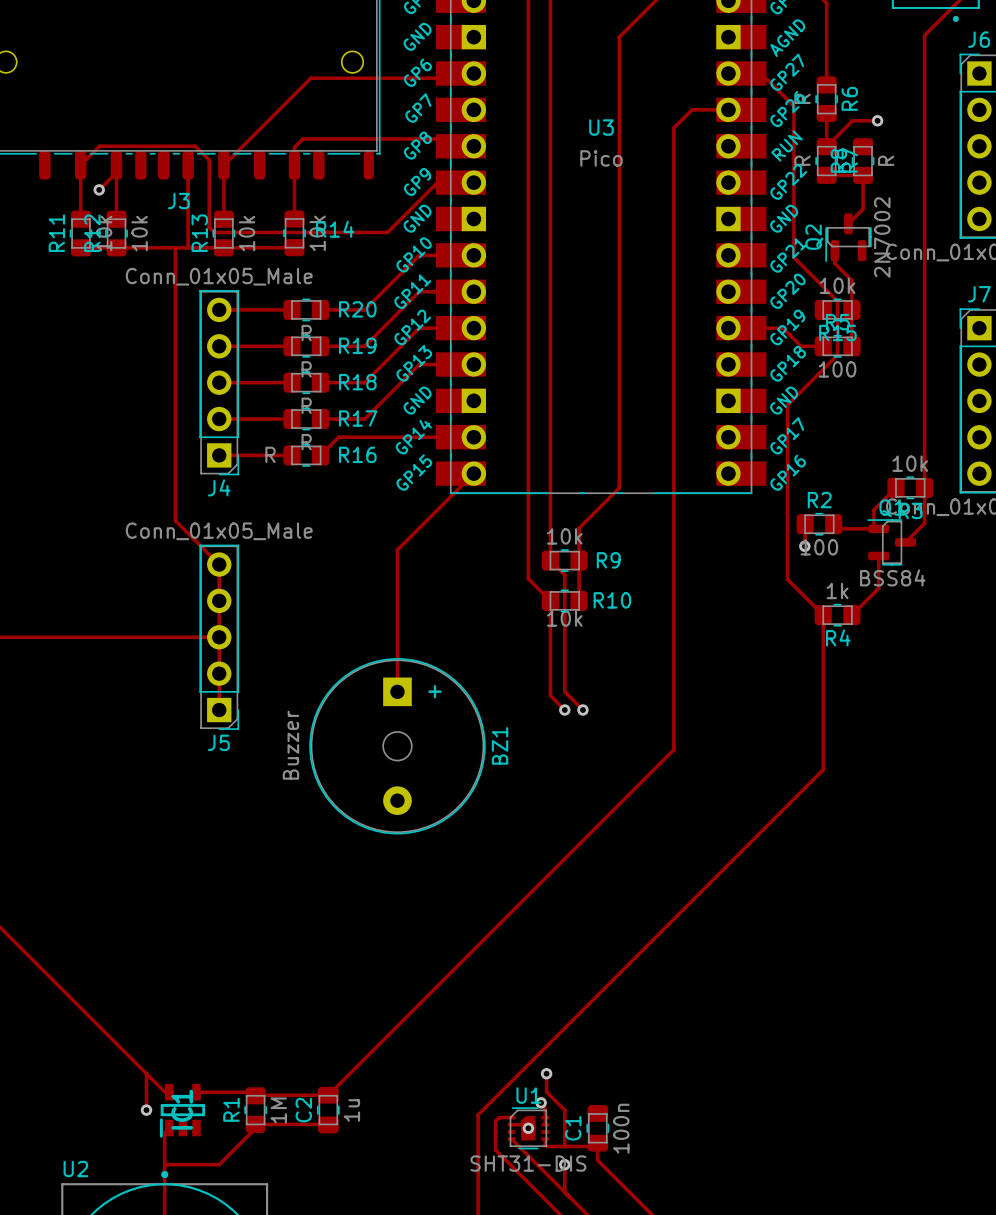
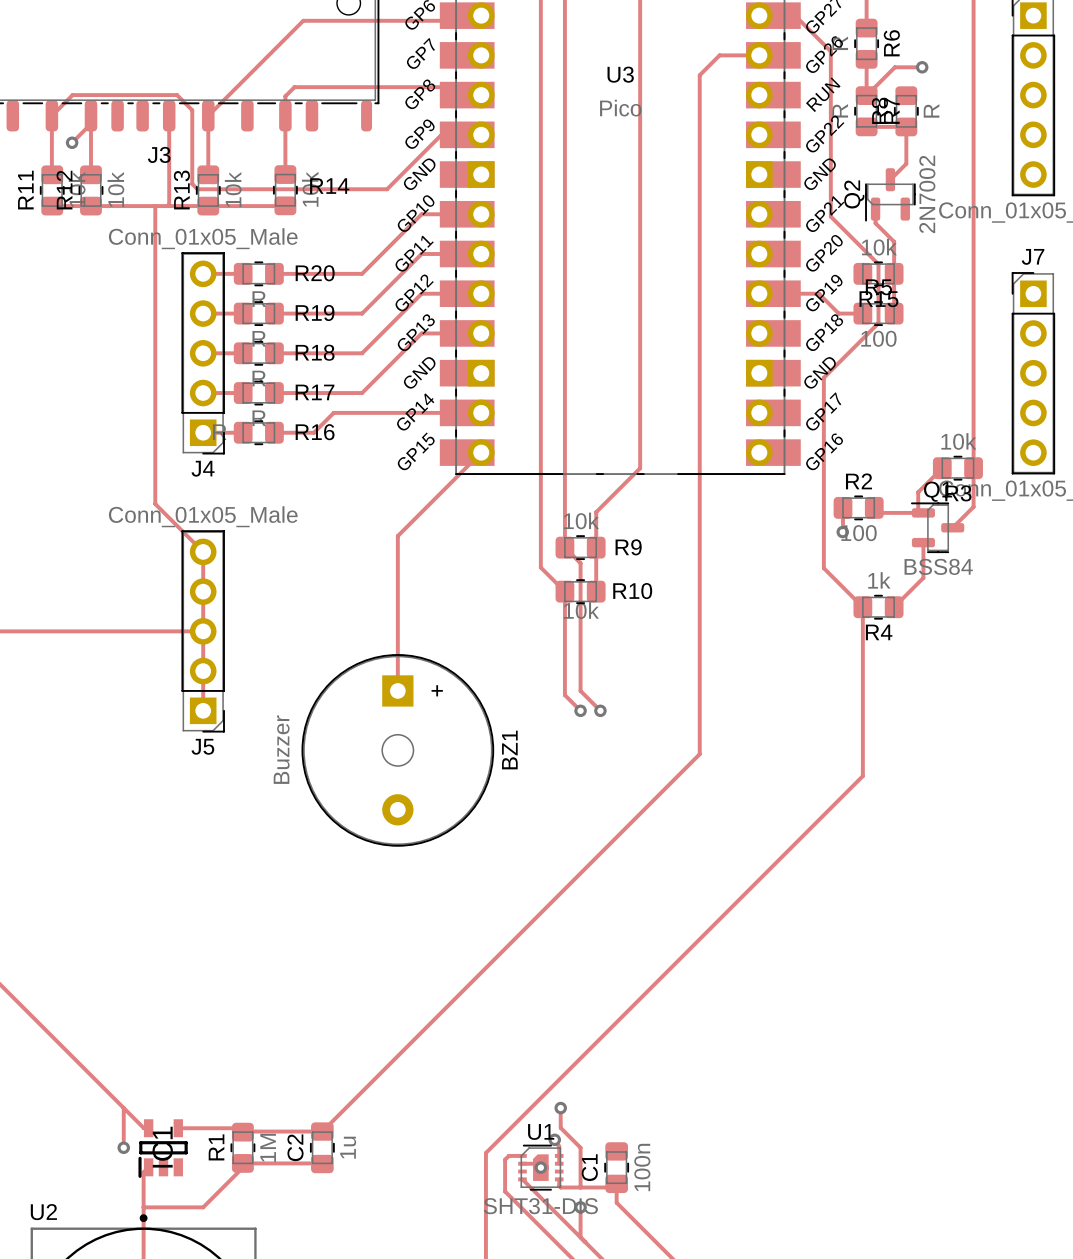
track: (255, 309) (284, 309) -> (282, 273) (313, 273)
R20 position: (306, 309) -> (258, 273)
track: (255, 346) (284, 346) -> (282, 313) (313, 313)
R19 position: (306, 346) -> (258, 313)
track: (255, 382) (284, 382) -> (282, 353) (313, 353)
R18 position: (306, 382) -> (258, 353)
track: (255, 419) (284, 419) -> (282, 393) (313, 393)
R17 position: (306, 419) -> (258, 393)
track: (255, 455) (284, 455) -> (282, 432) (313, 432)
R16 position: (306, 455) -> (258, 432)

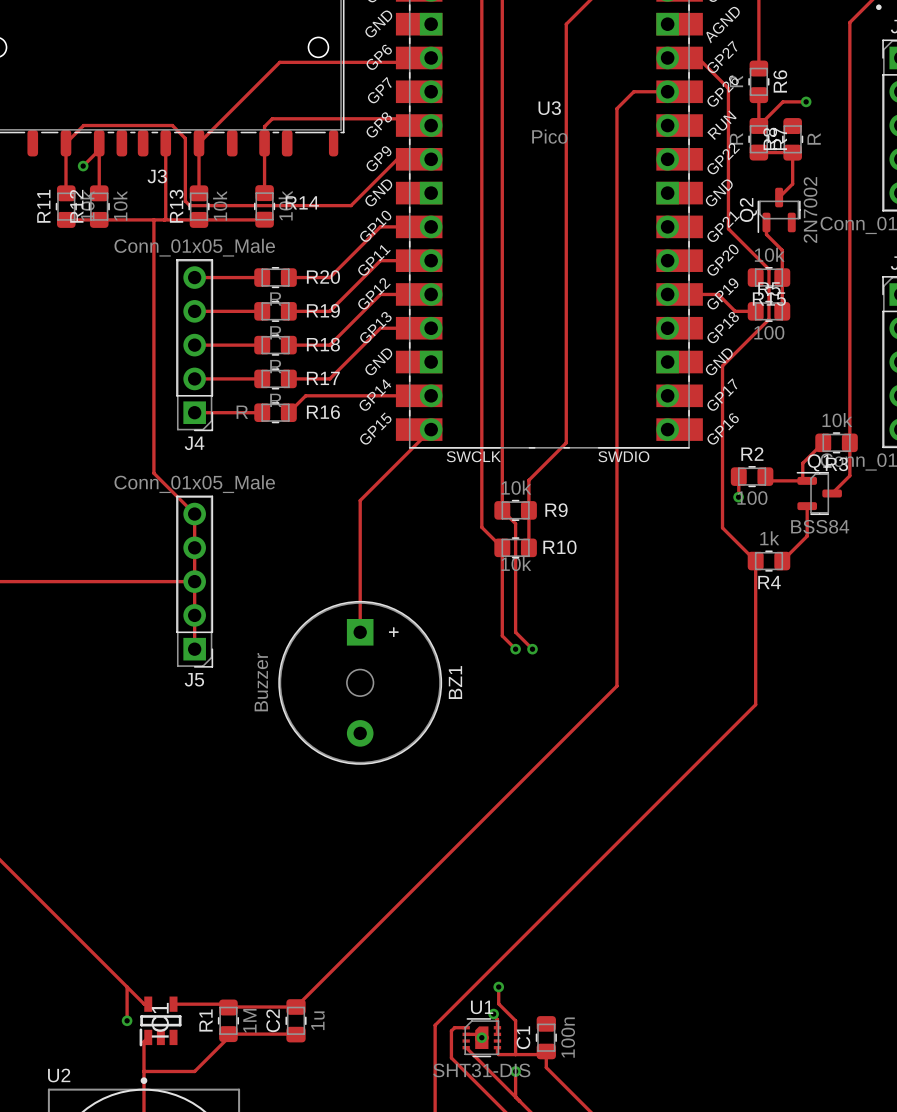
R20 position: (258, 273) -> (275, 277)
track: (282, 273) (313, 273) -> (228, 277) (255, 277)
R19 position: (258, 313) -> (275, 311)
track: (282, 313) (313, 313) -> (228, 311) (255, 311)
R18 position: (258, 353) -> (275, 345)
track: (282, 353) (313, 353) -> (228, 345) (255, 345)
R17 position: (258, 393) -> (275, 378)
track: (282, 393) (313, 393) -> (228, 378) (255, 378)
R16 position: (258, 432) -> (275, 412)
track: (282, 432) (313, 432) -> (228, 412) (255, 412)
U3 text: none -> SWCLK (473, 456)
U3 text: none -> SWDIO (623, 456)

